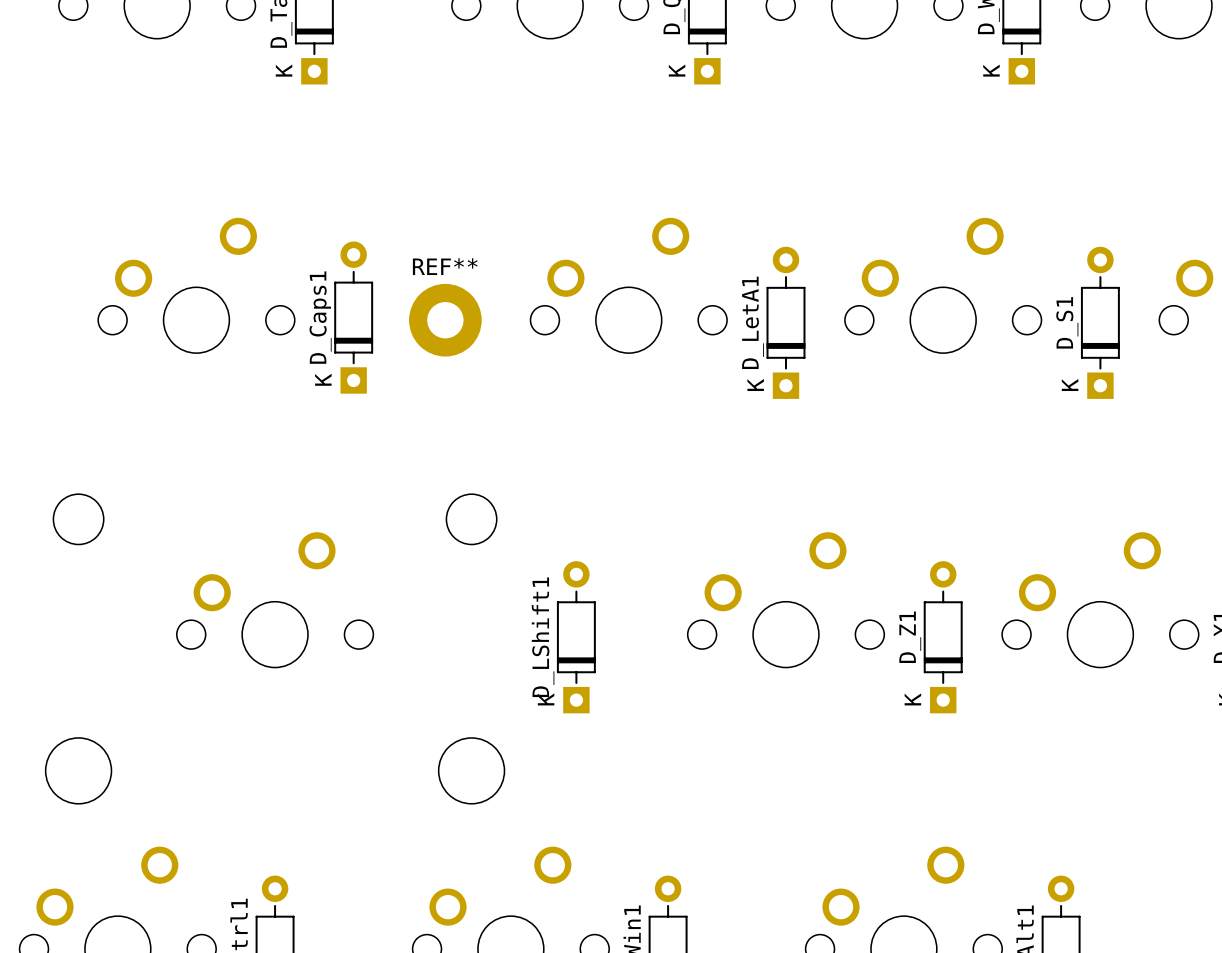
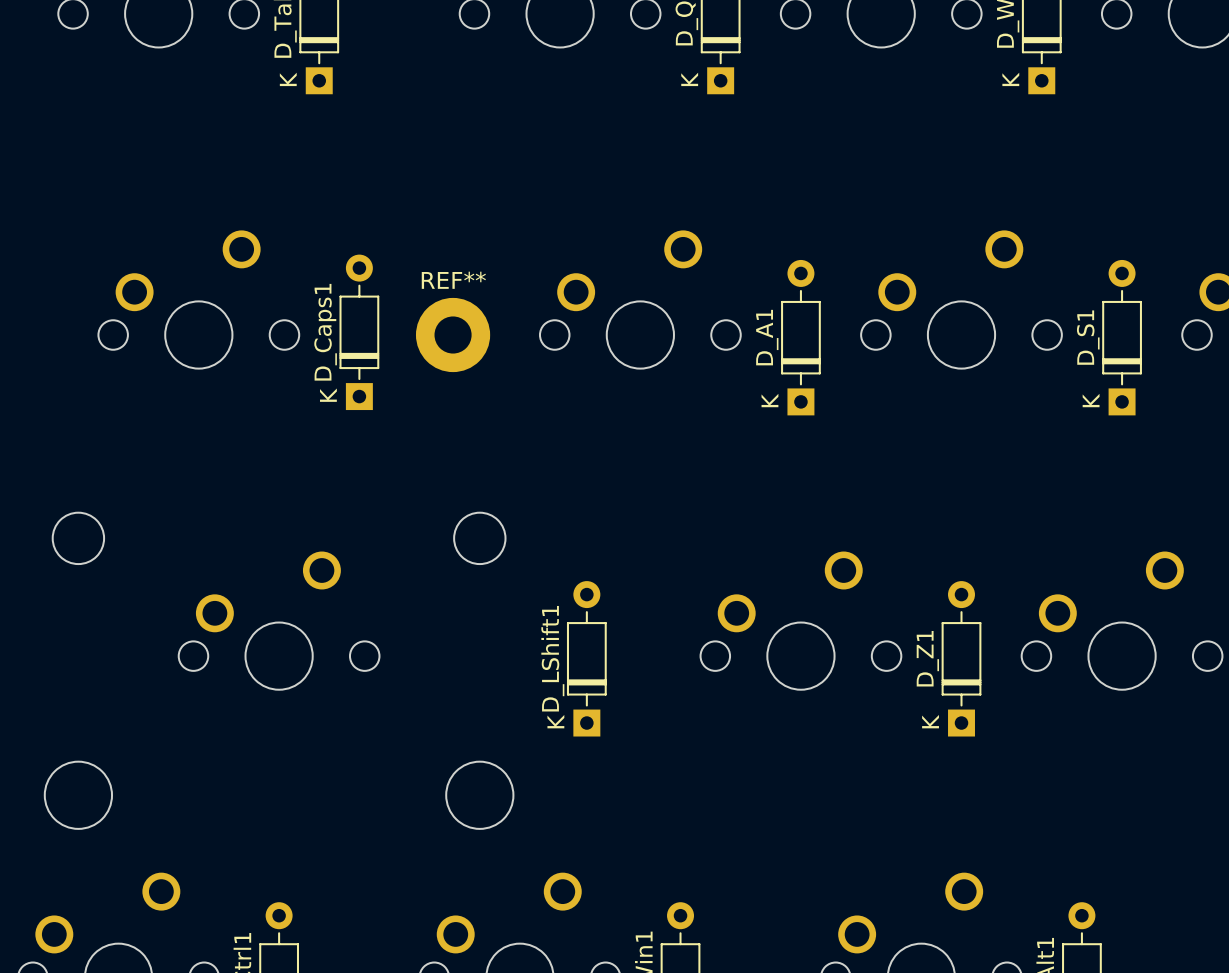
D_LetA1 name: D_LetA1 (753, 322) -> D_A1 (767, 337)

